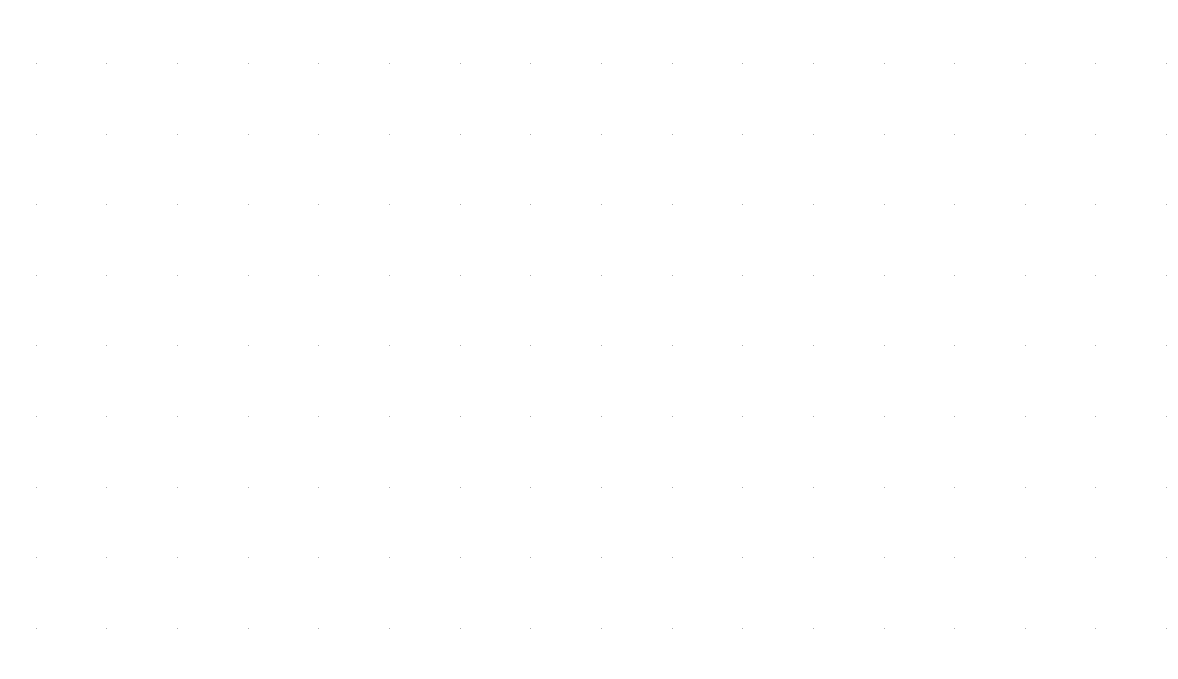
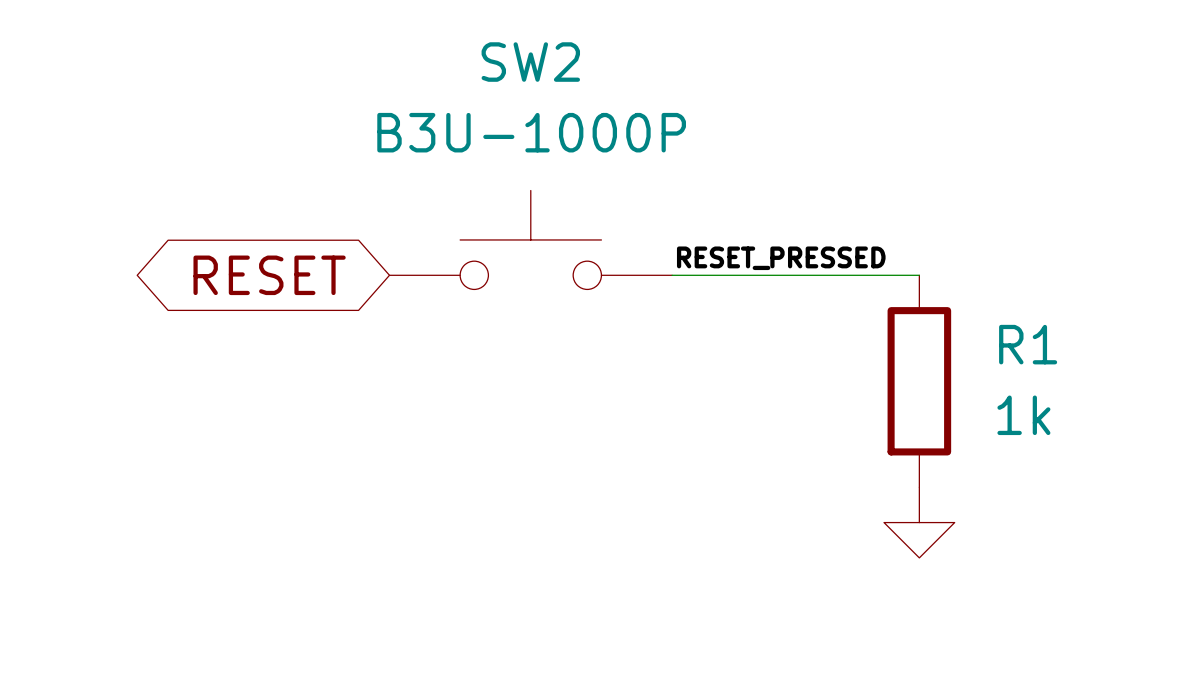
SW2: none -> B3U-1000P (530, 239)
label: none -> RESET_PRESSED (781, 258)
global label: none -> RESET (269, 275)
wire: none -> (672, 275) (919, 275)
R1: none -> 1k (919, 381)
power symbol: none -> (919, 522)

